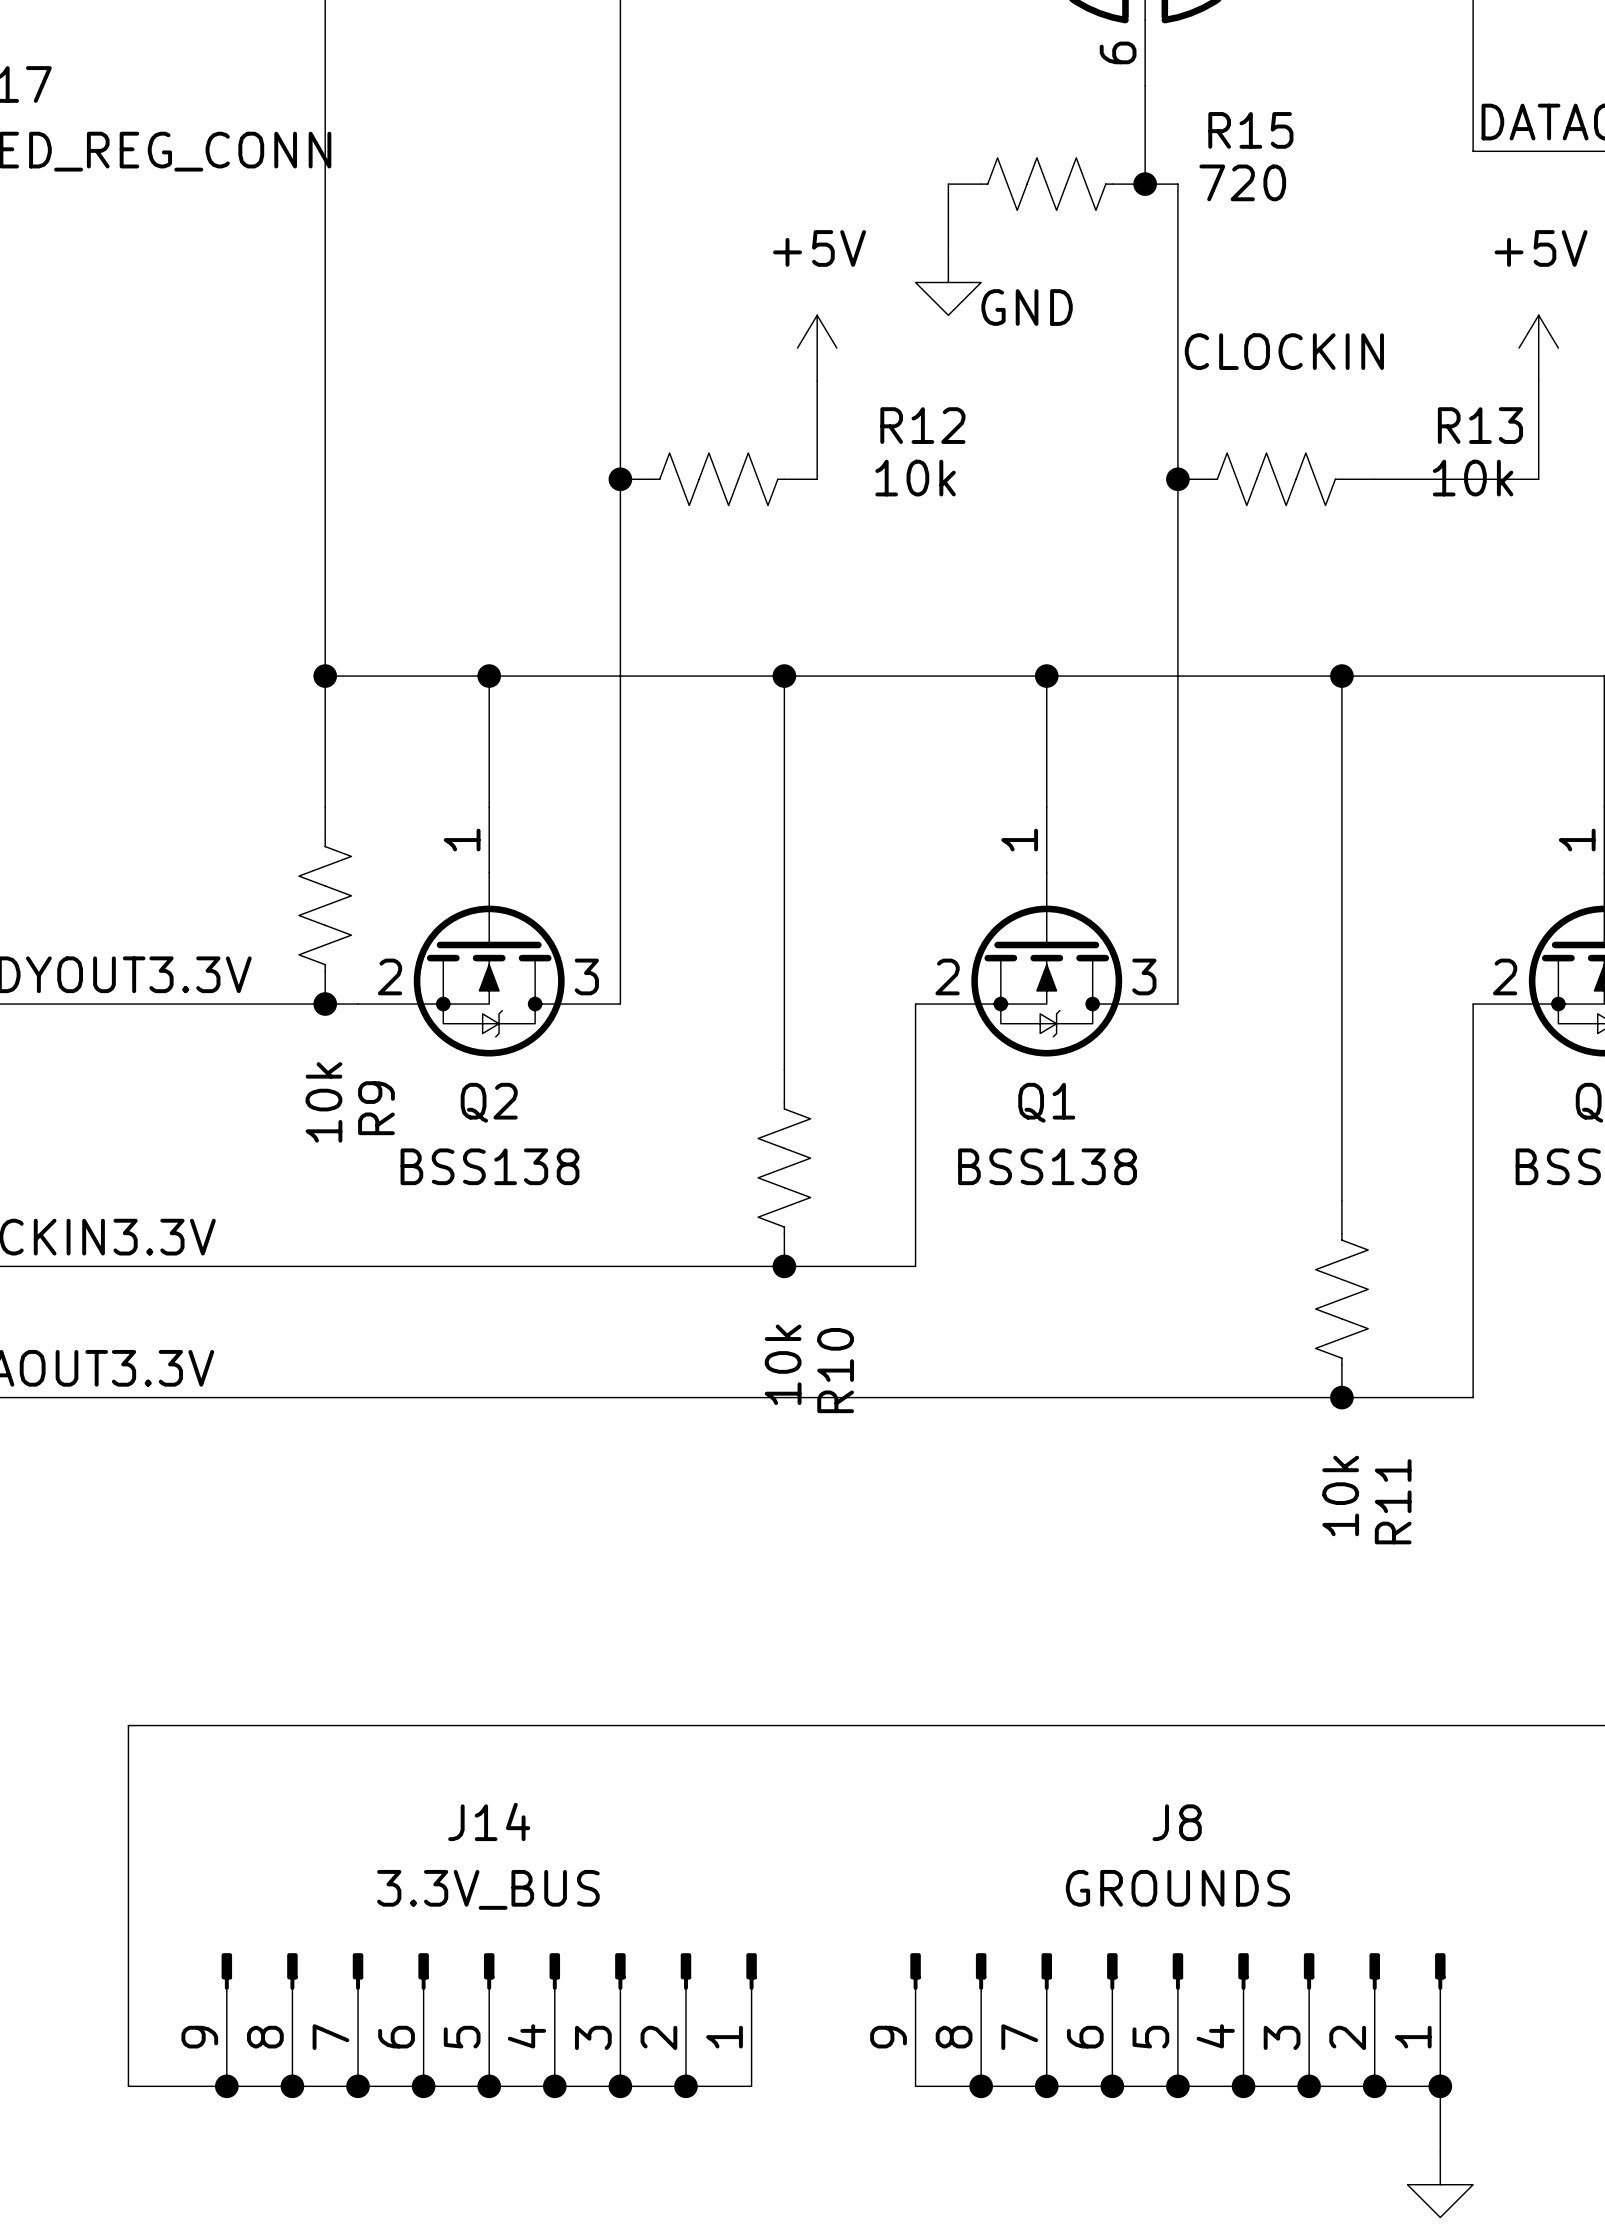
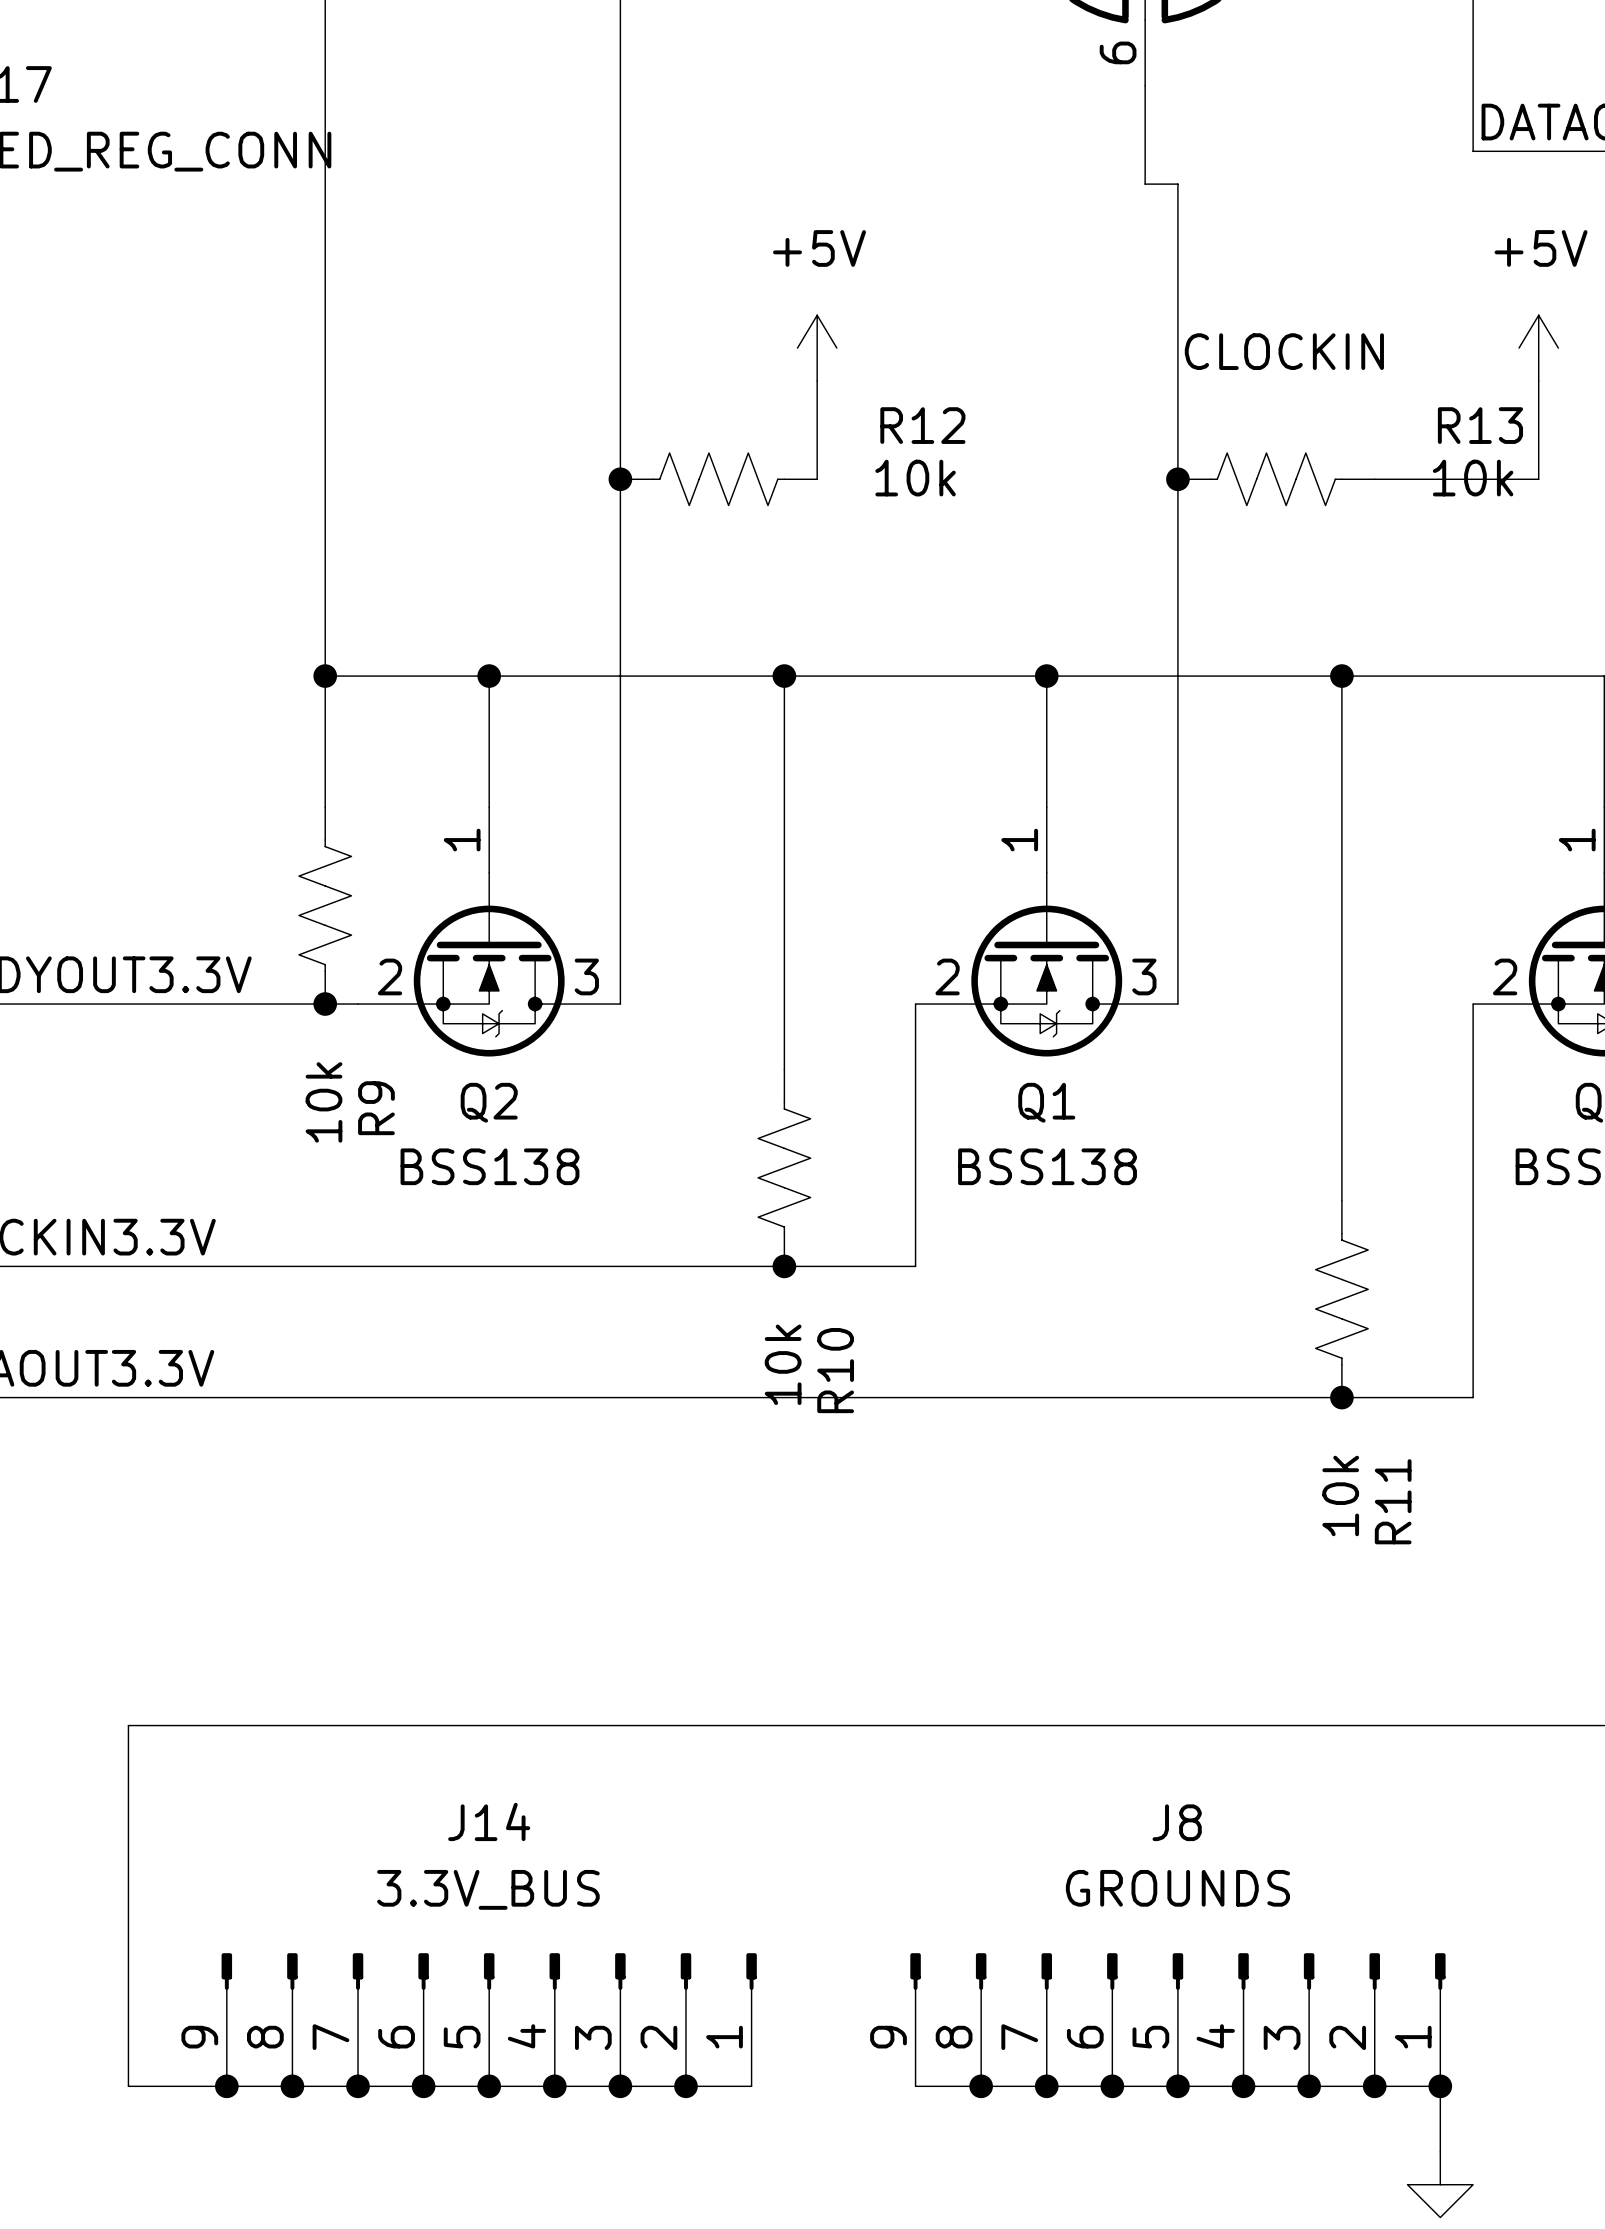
wire: (948, 184) (948, 249) -> none
R15: 720 (1046, 184) -> none
junction: (1145, 184) -> none
power symbol: GND (948, 282) -> none

